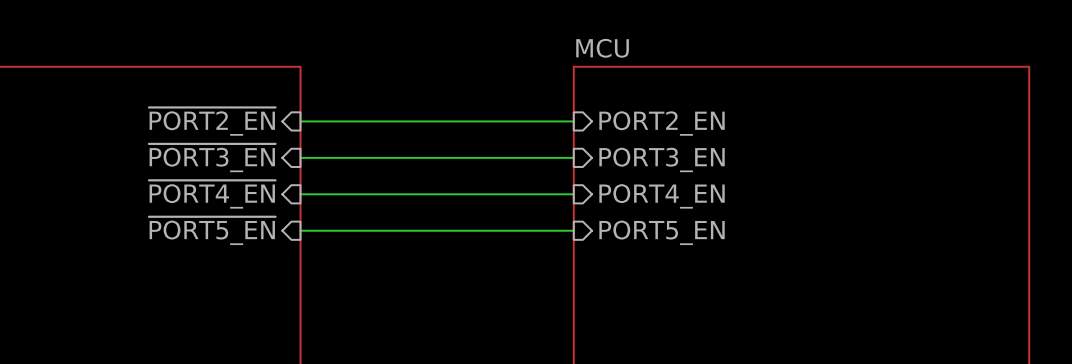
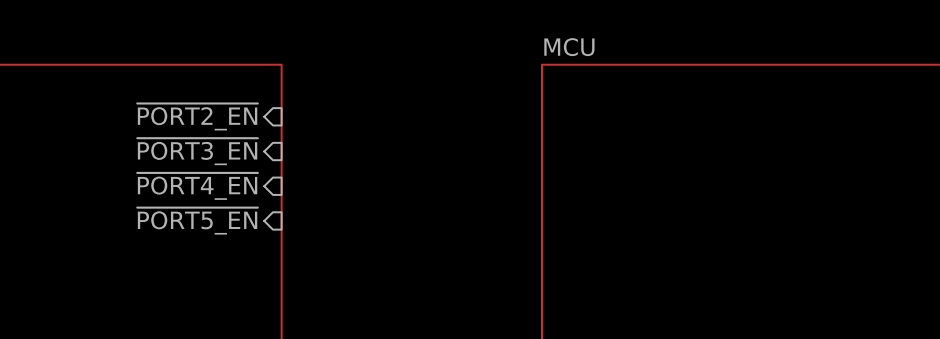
wire: (300, 121) (573, 121) -> none
sheet pin: PORT2_EN (662, 123) -> none
wire: (300, 157) (573, 157) -> none
sheet pin: PORT3_EN (662, 159) -> none
wire: (300, 194) (573, 194) -> none
sheet pin: PORT4_EN (662, 196) -> none
wire: (300, 230) (573, 230) -> none
sheet pin: PORT5_EN (662, 232) -> none

